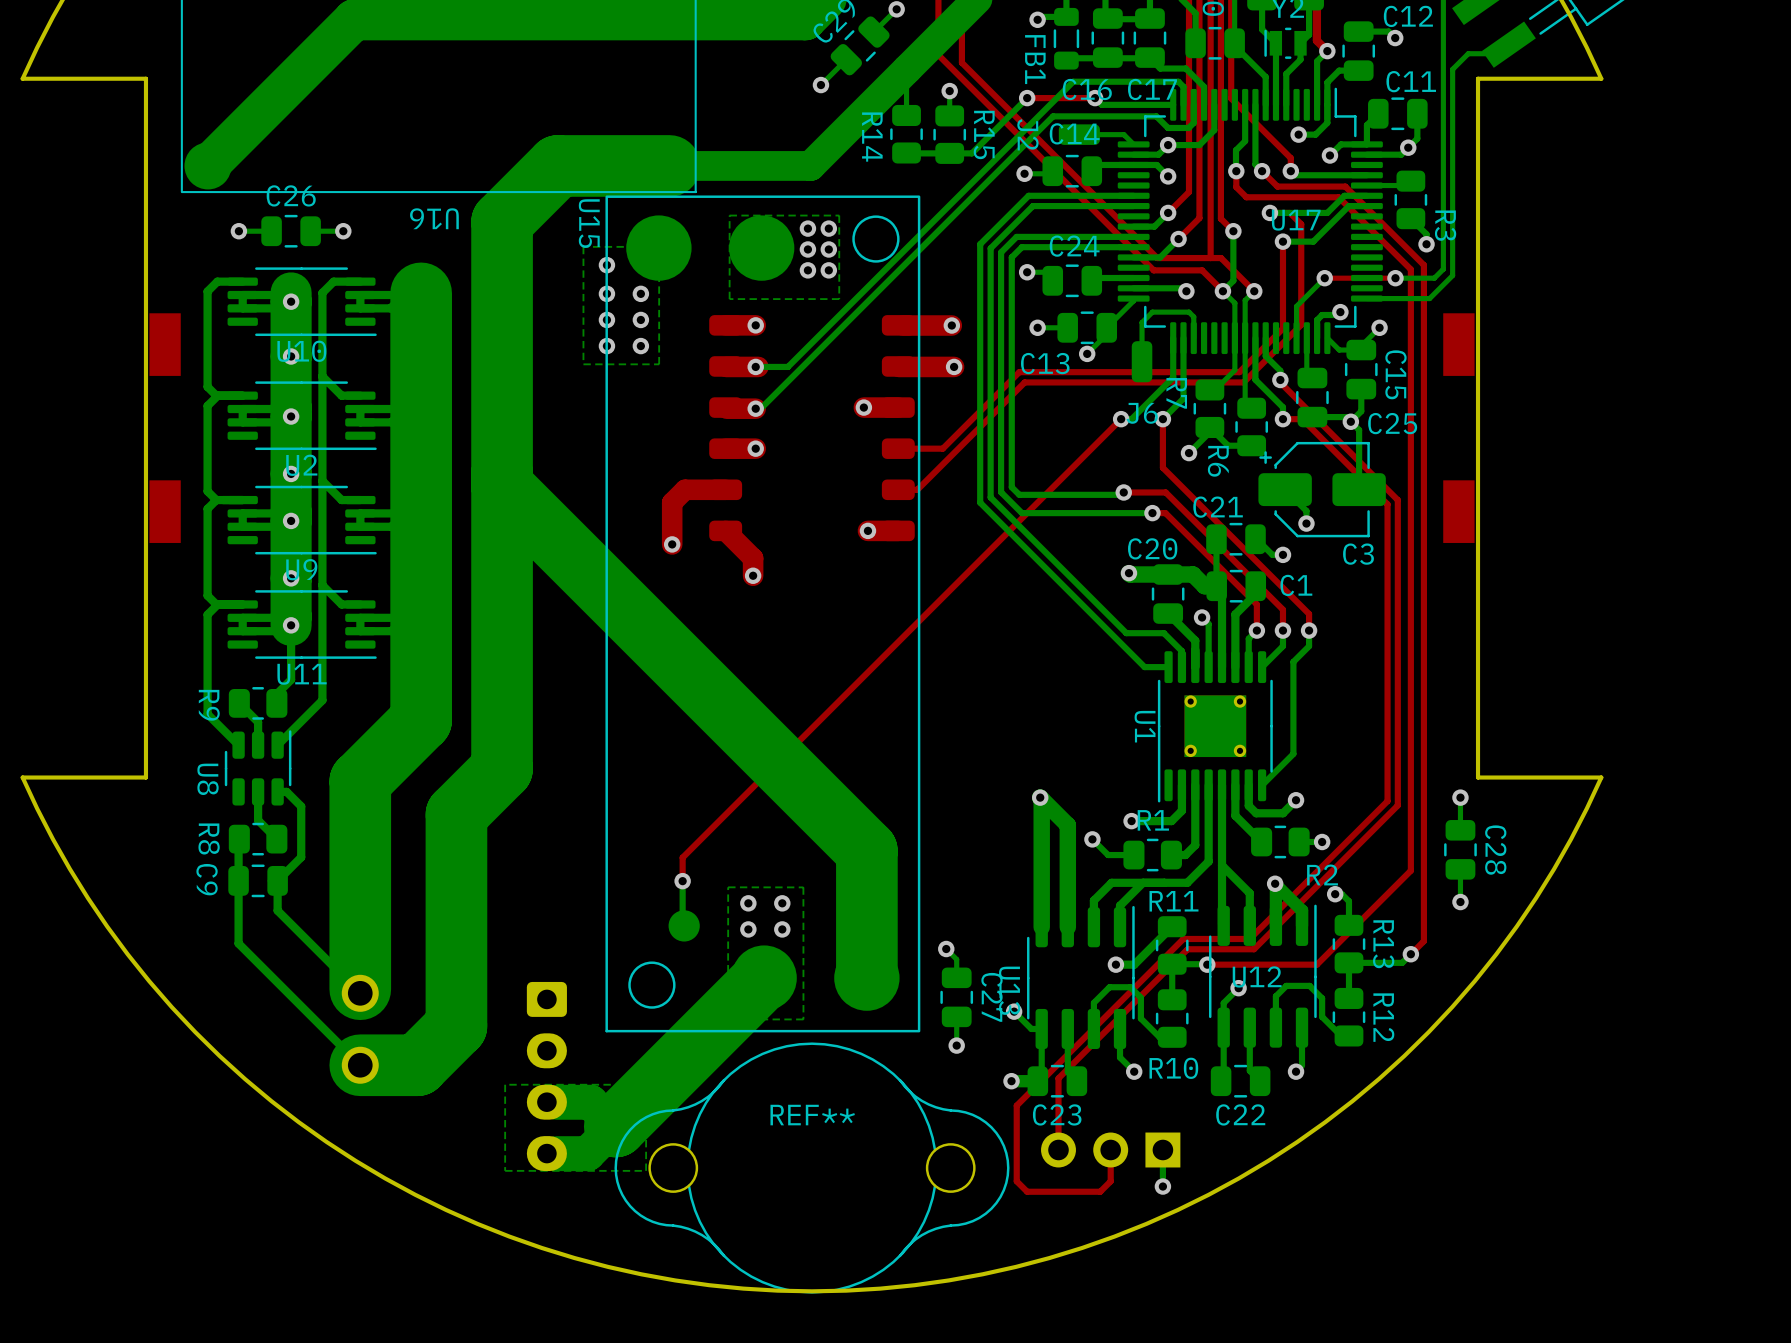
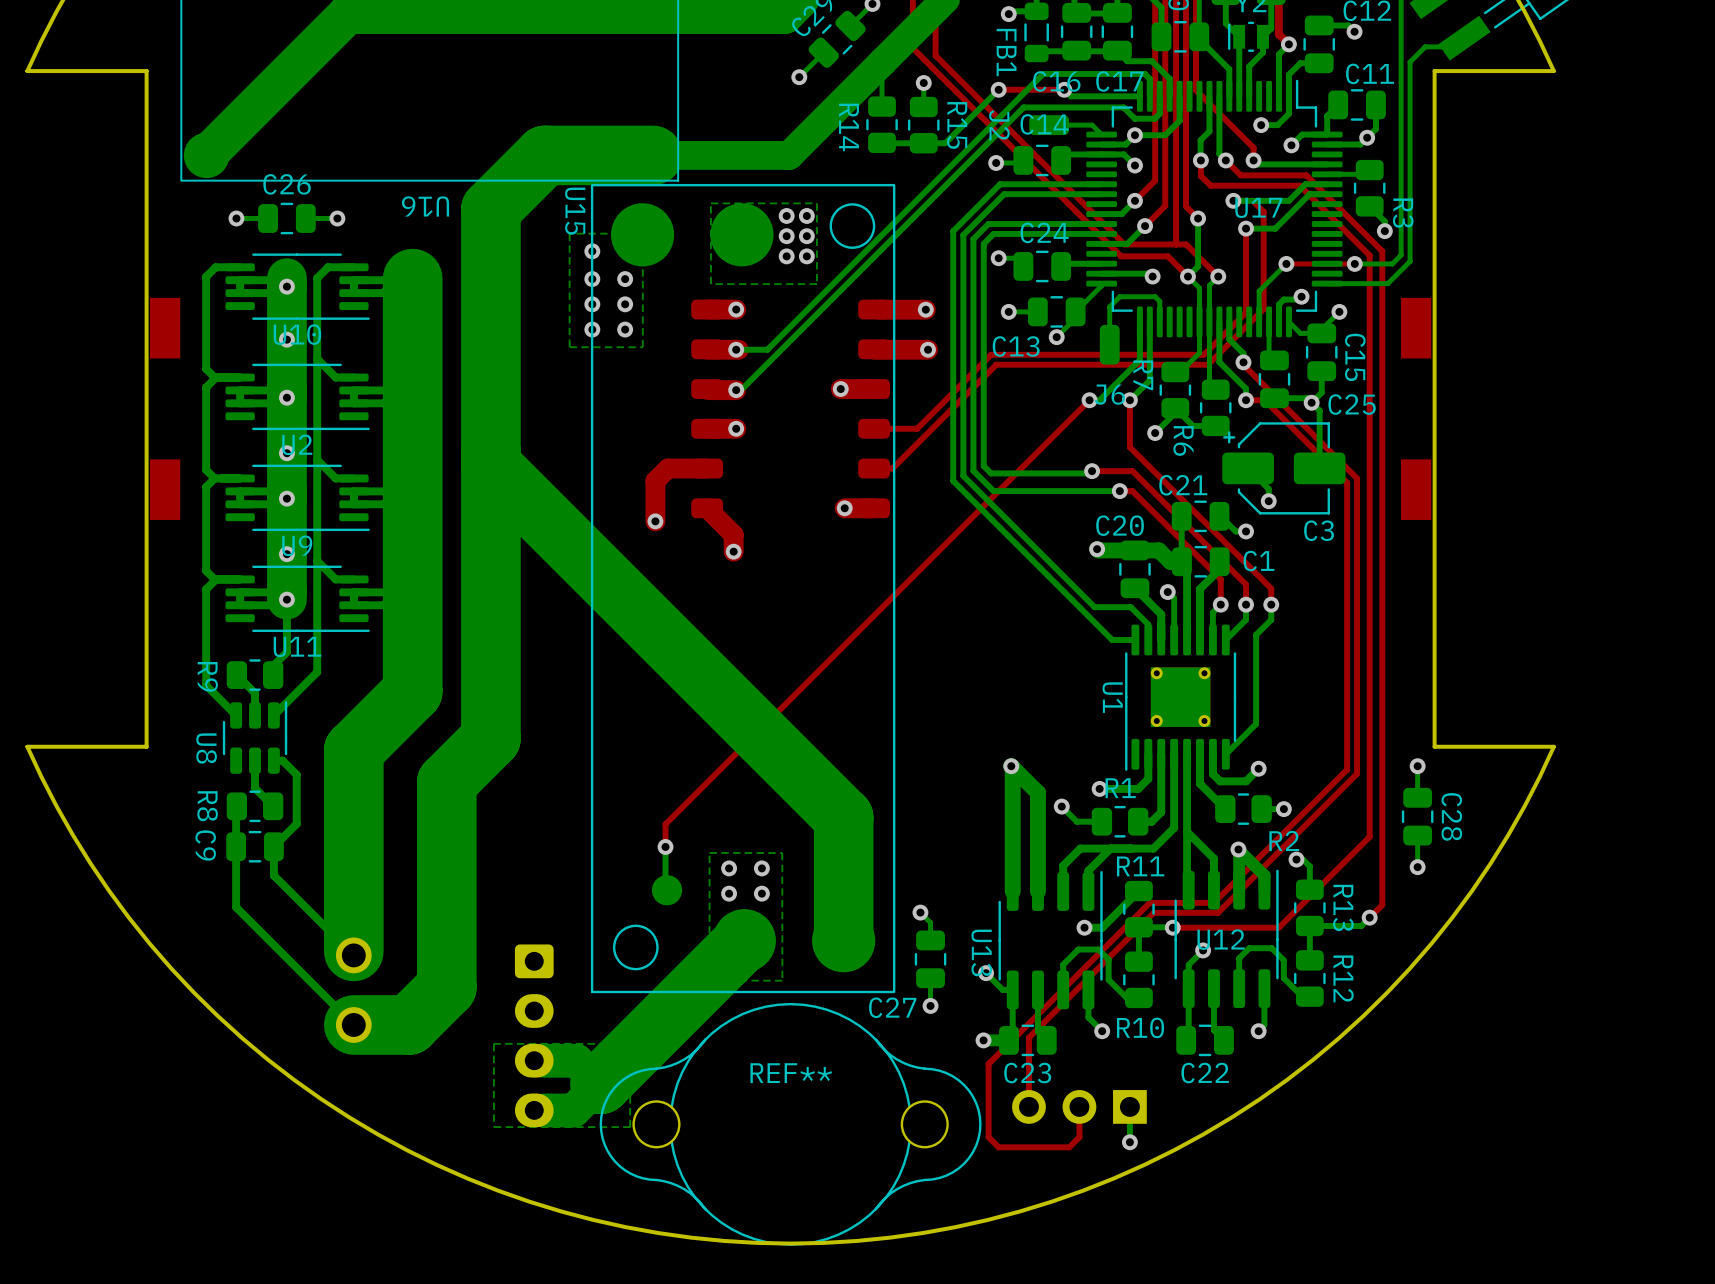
C27 name rotation: 0° (992, 997) -> 90° counterclockwise (892, 1007)
C27 name position: C27 (992, 997) -> C27 (892, 1007)

